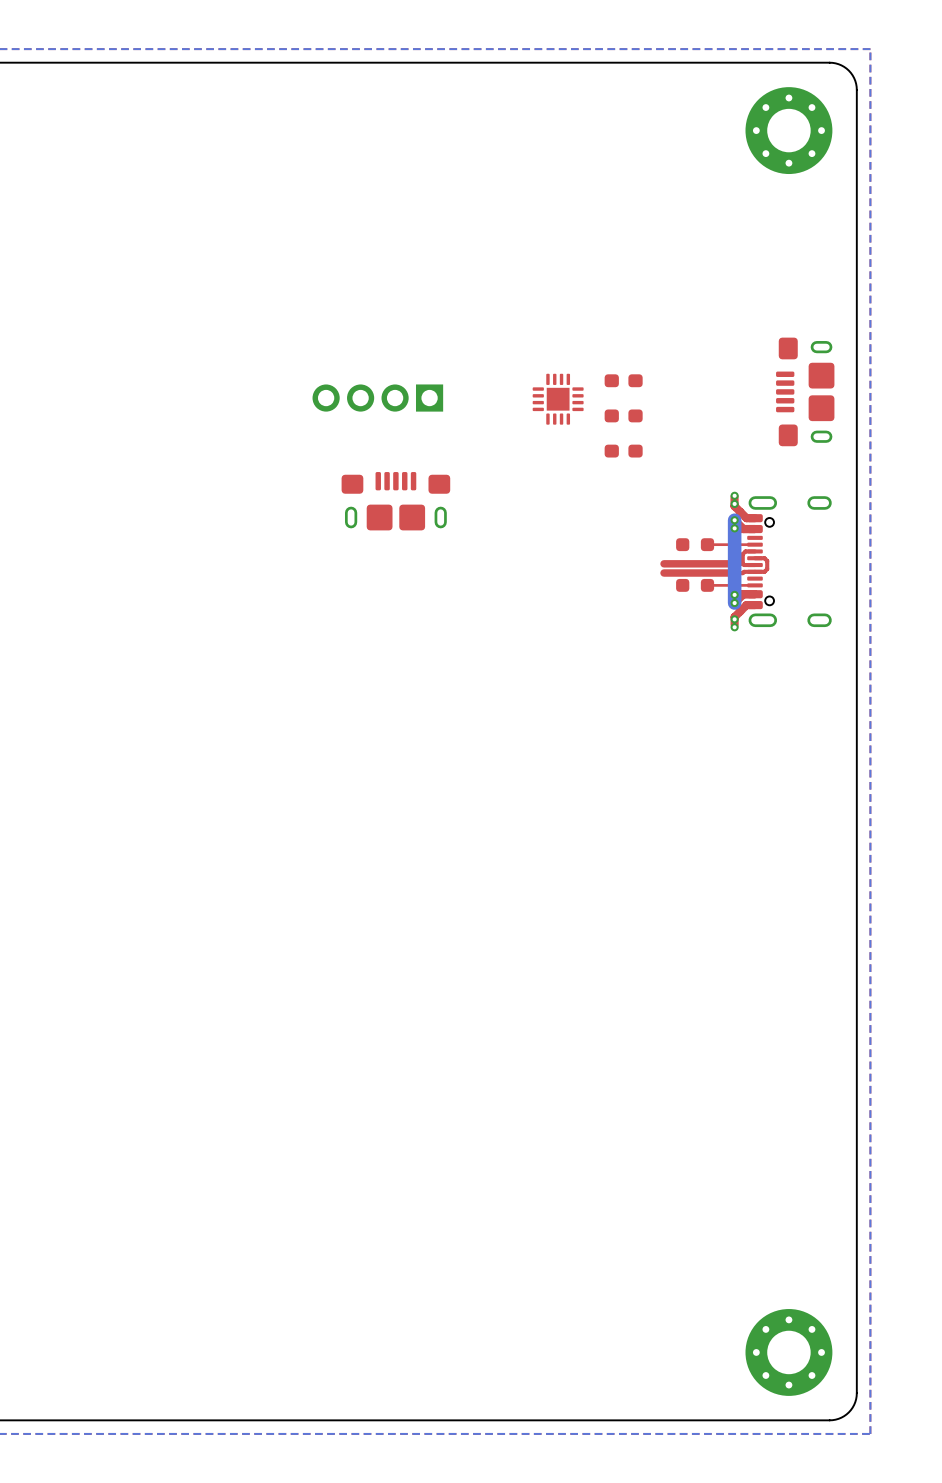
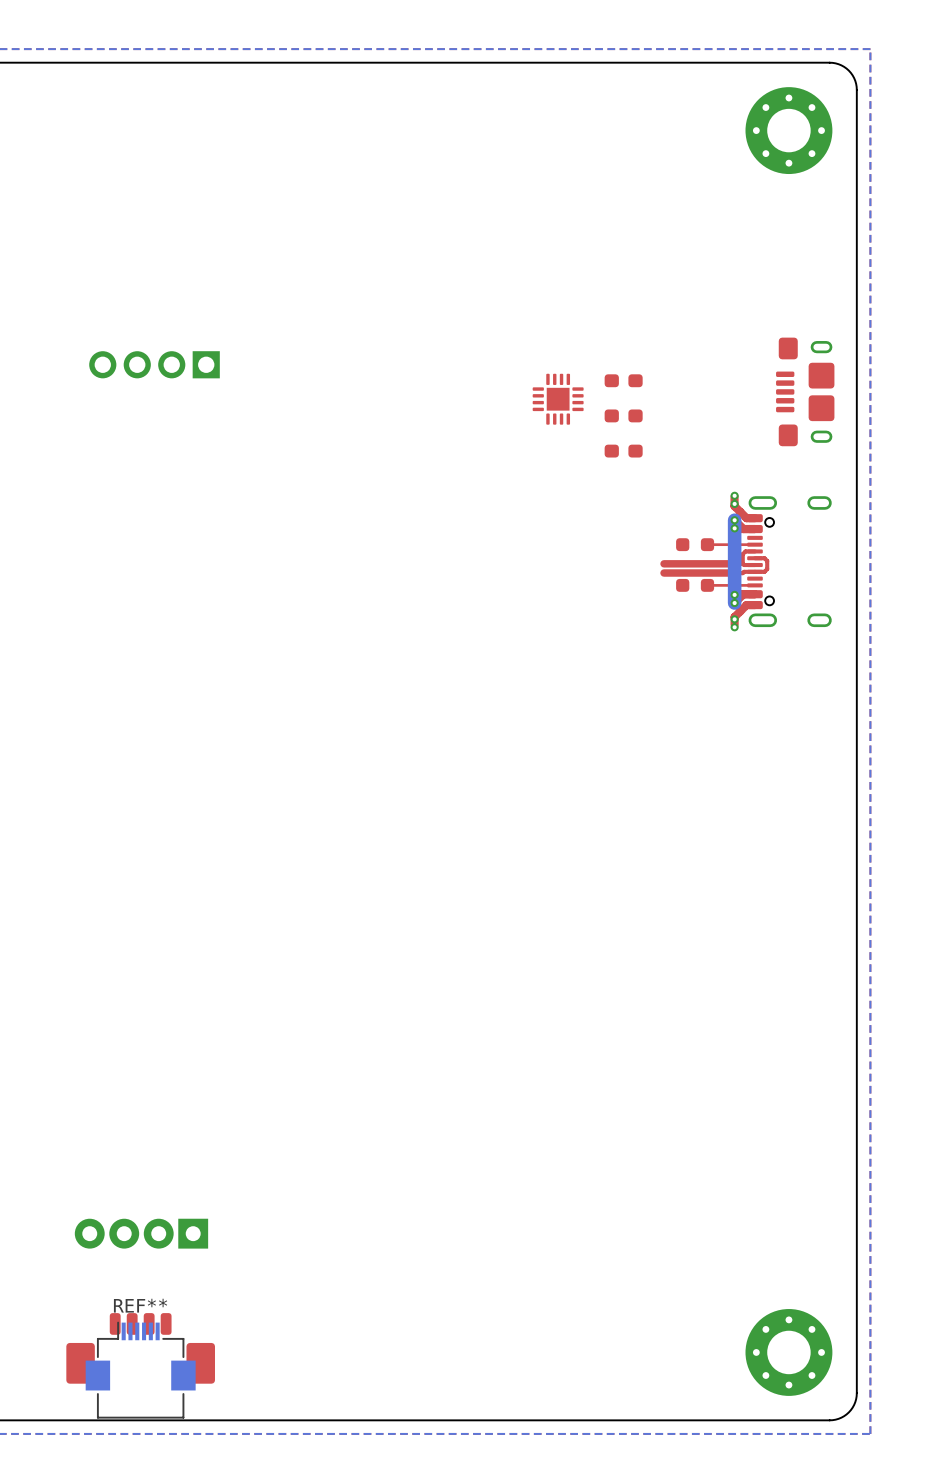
part position: (377, 398) -> (154, 364)
part: (395, 501) -> none
part: none -> (141, 1233)
part: none -> (140, 1348)
REF**: none -> (140, 1370)

